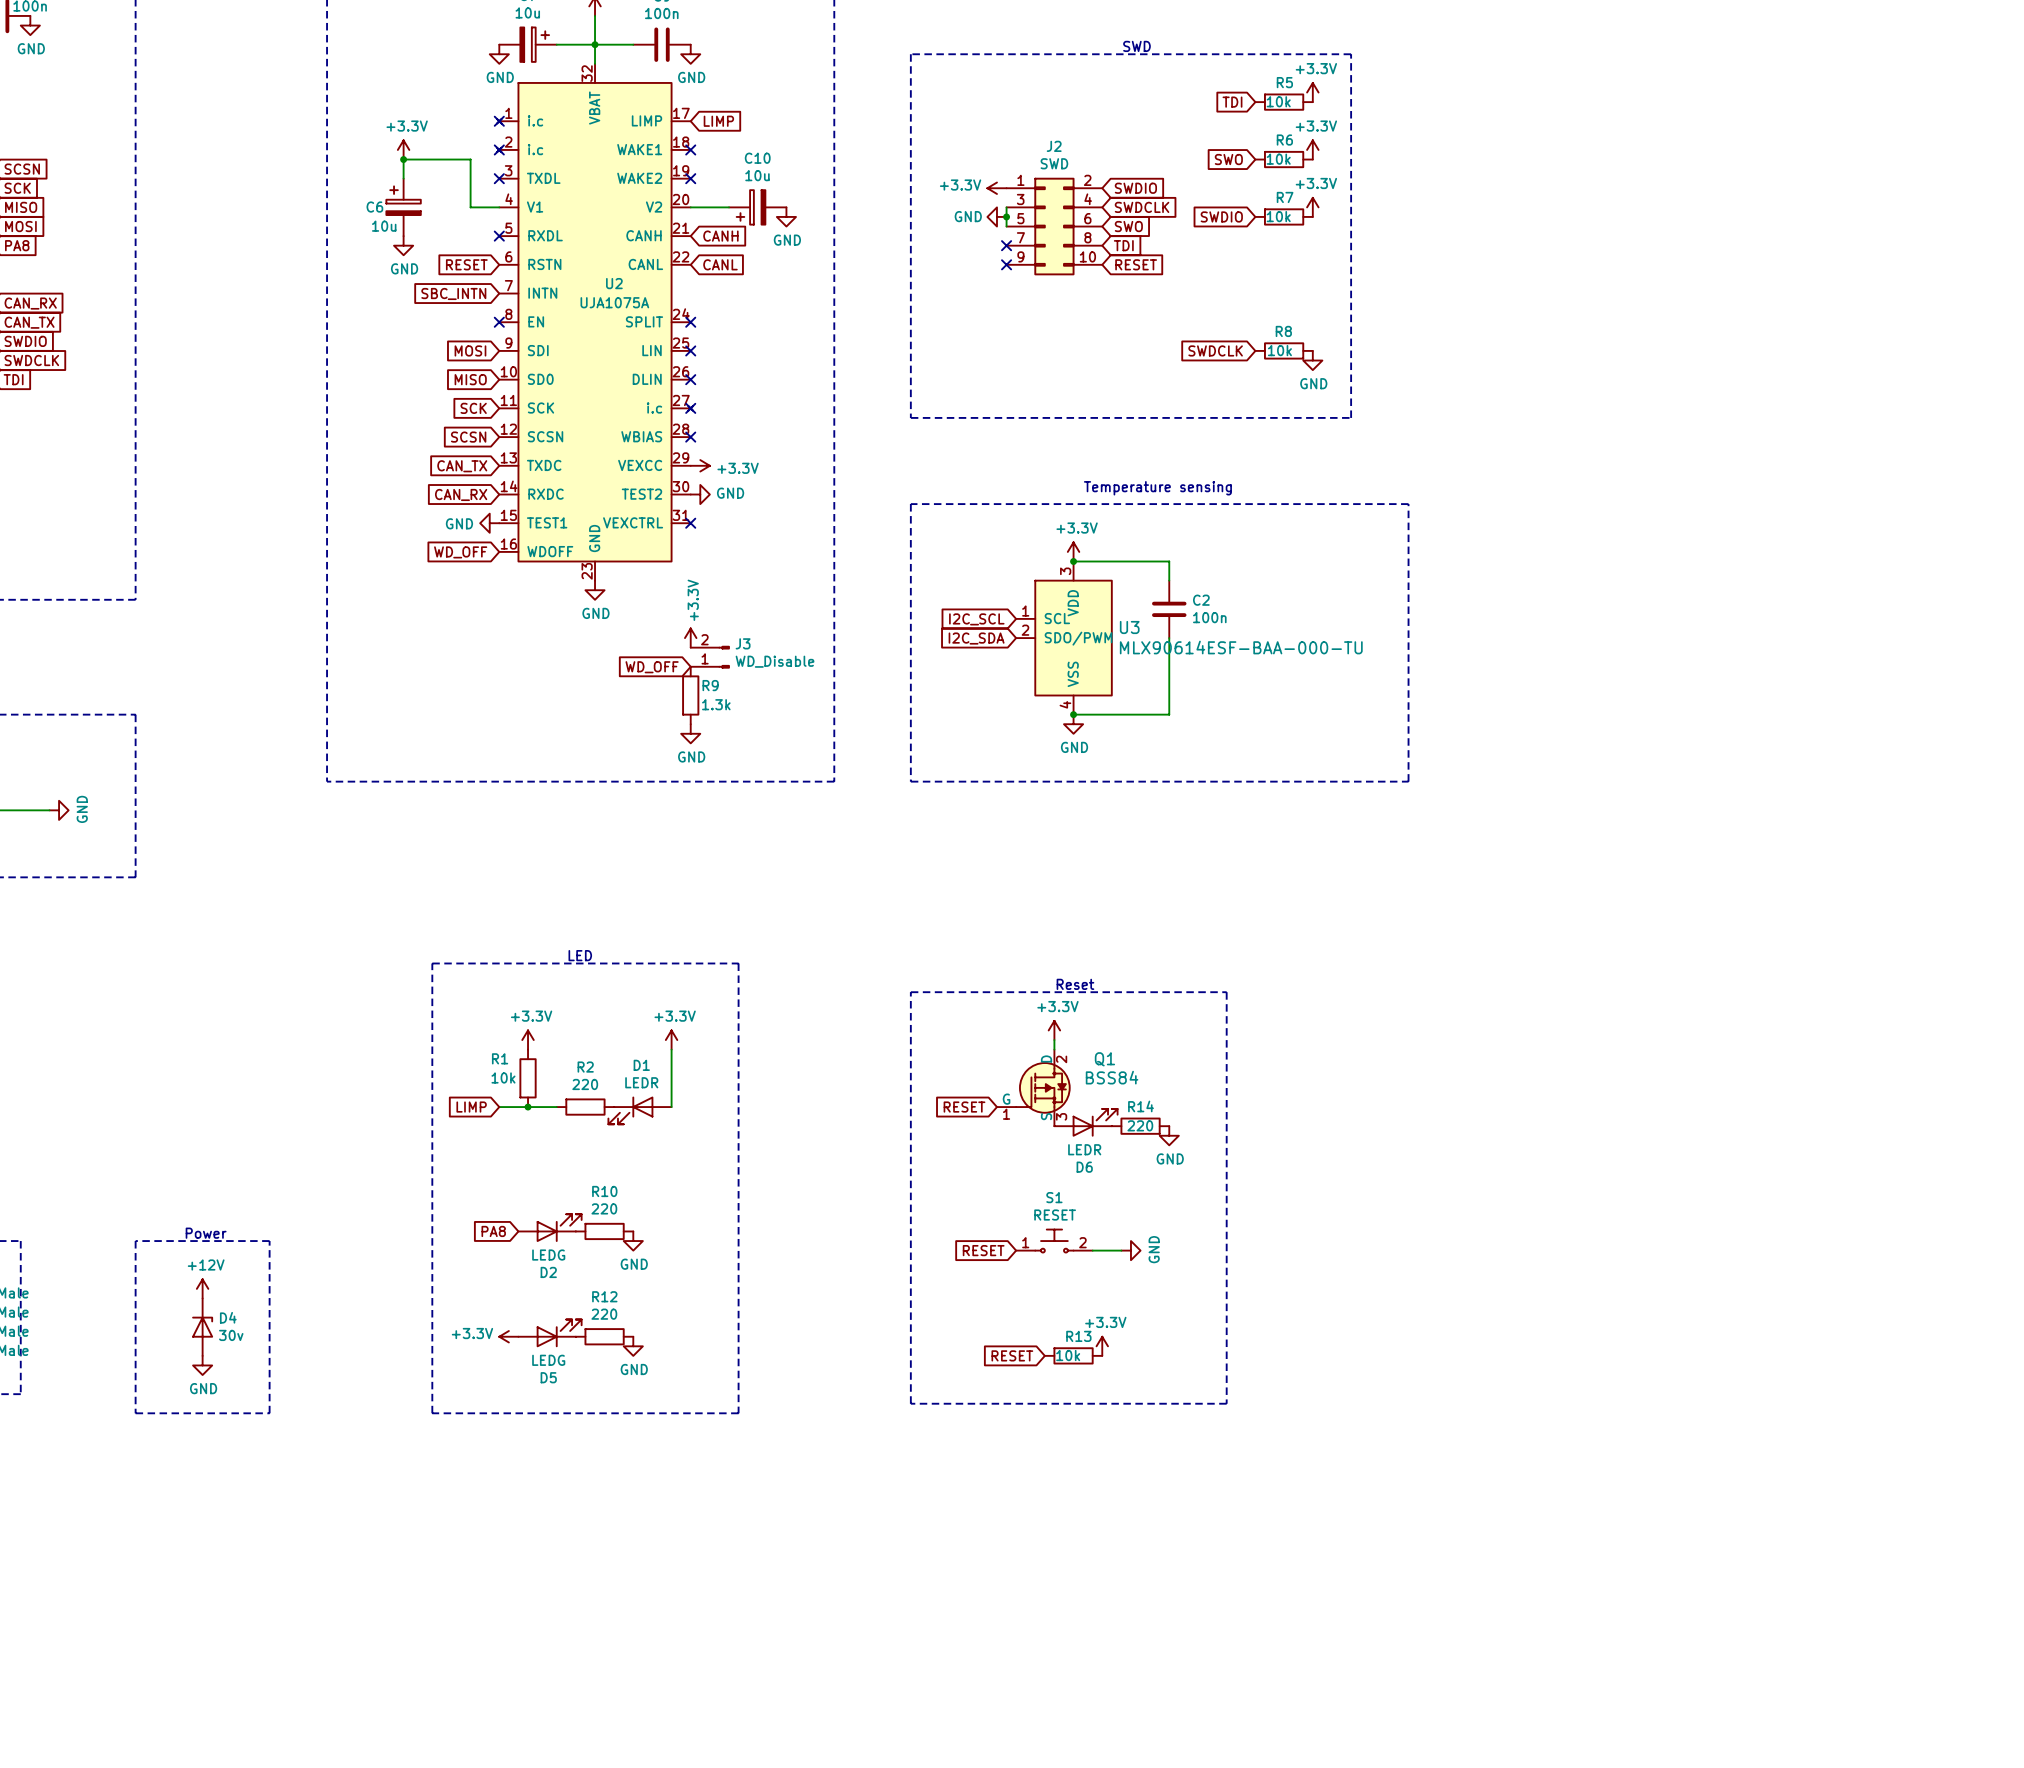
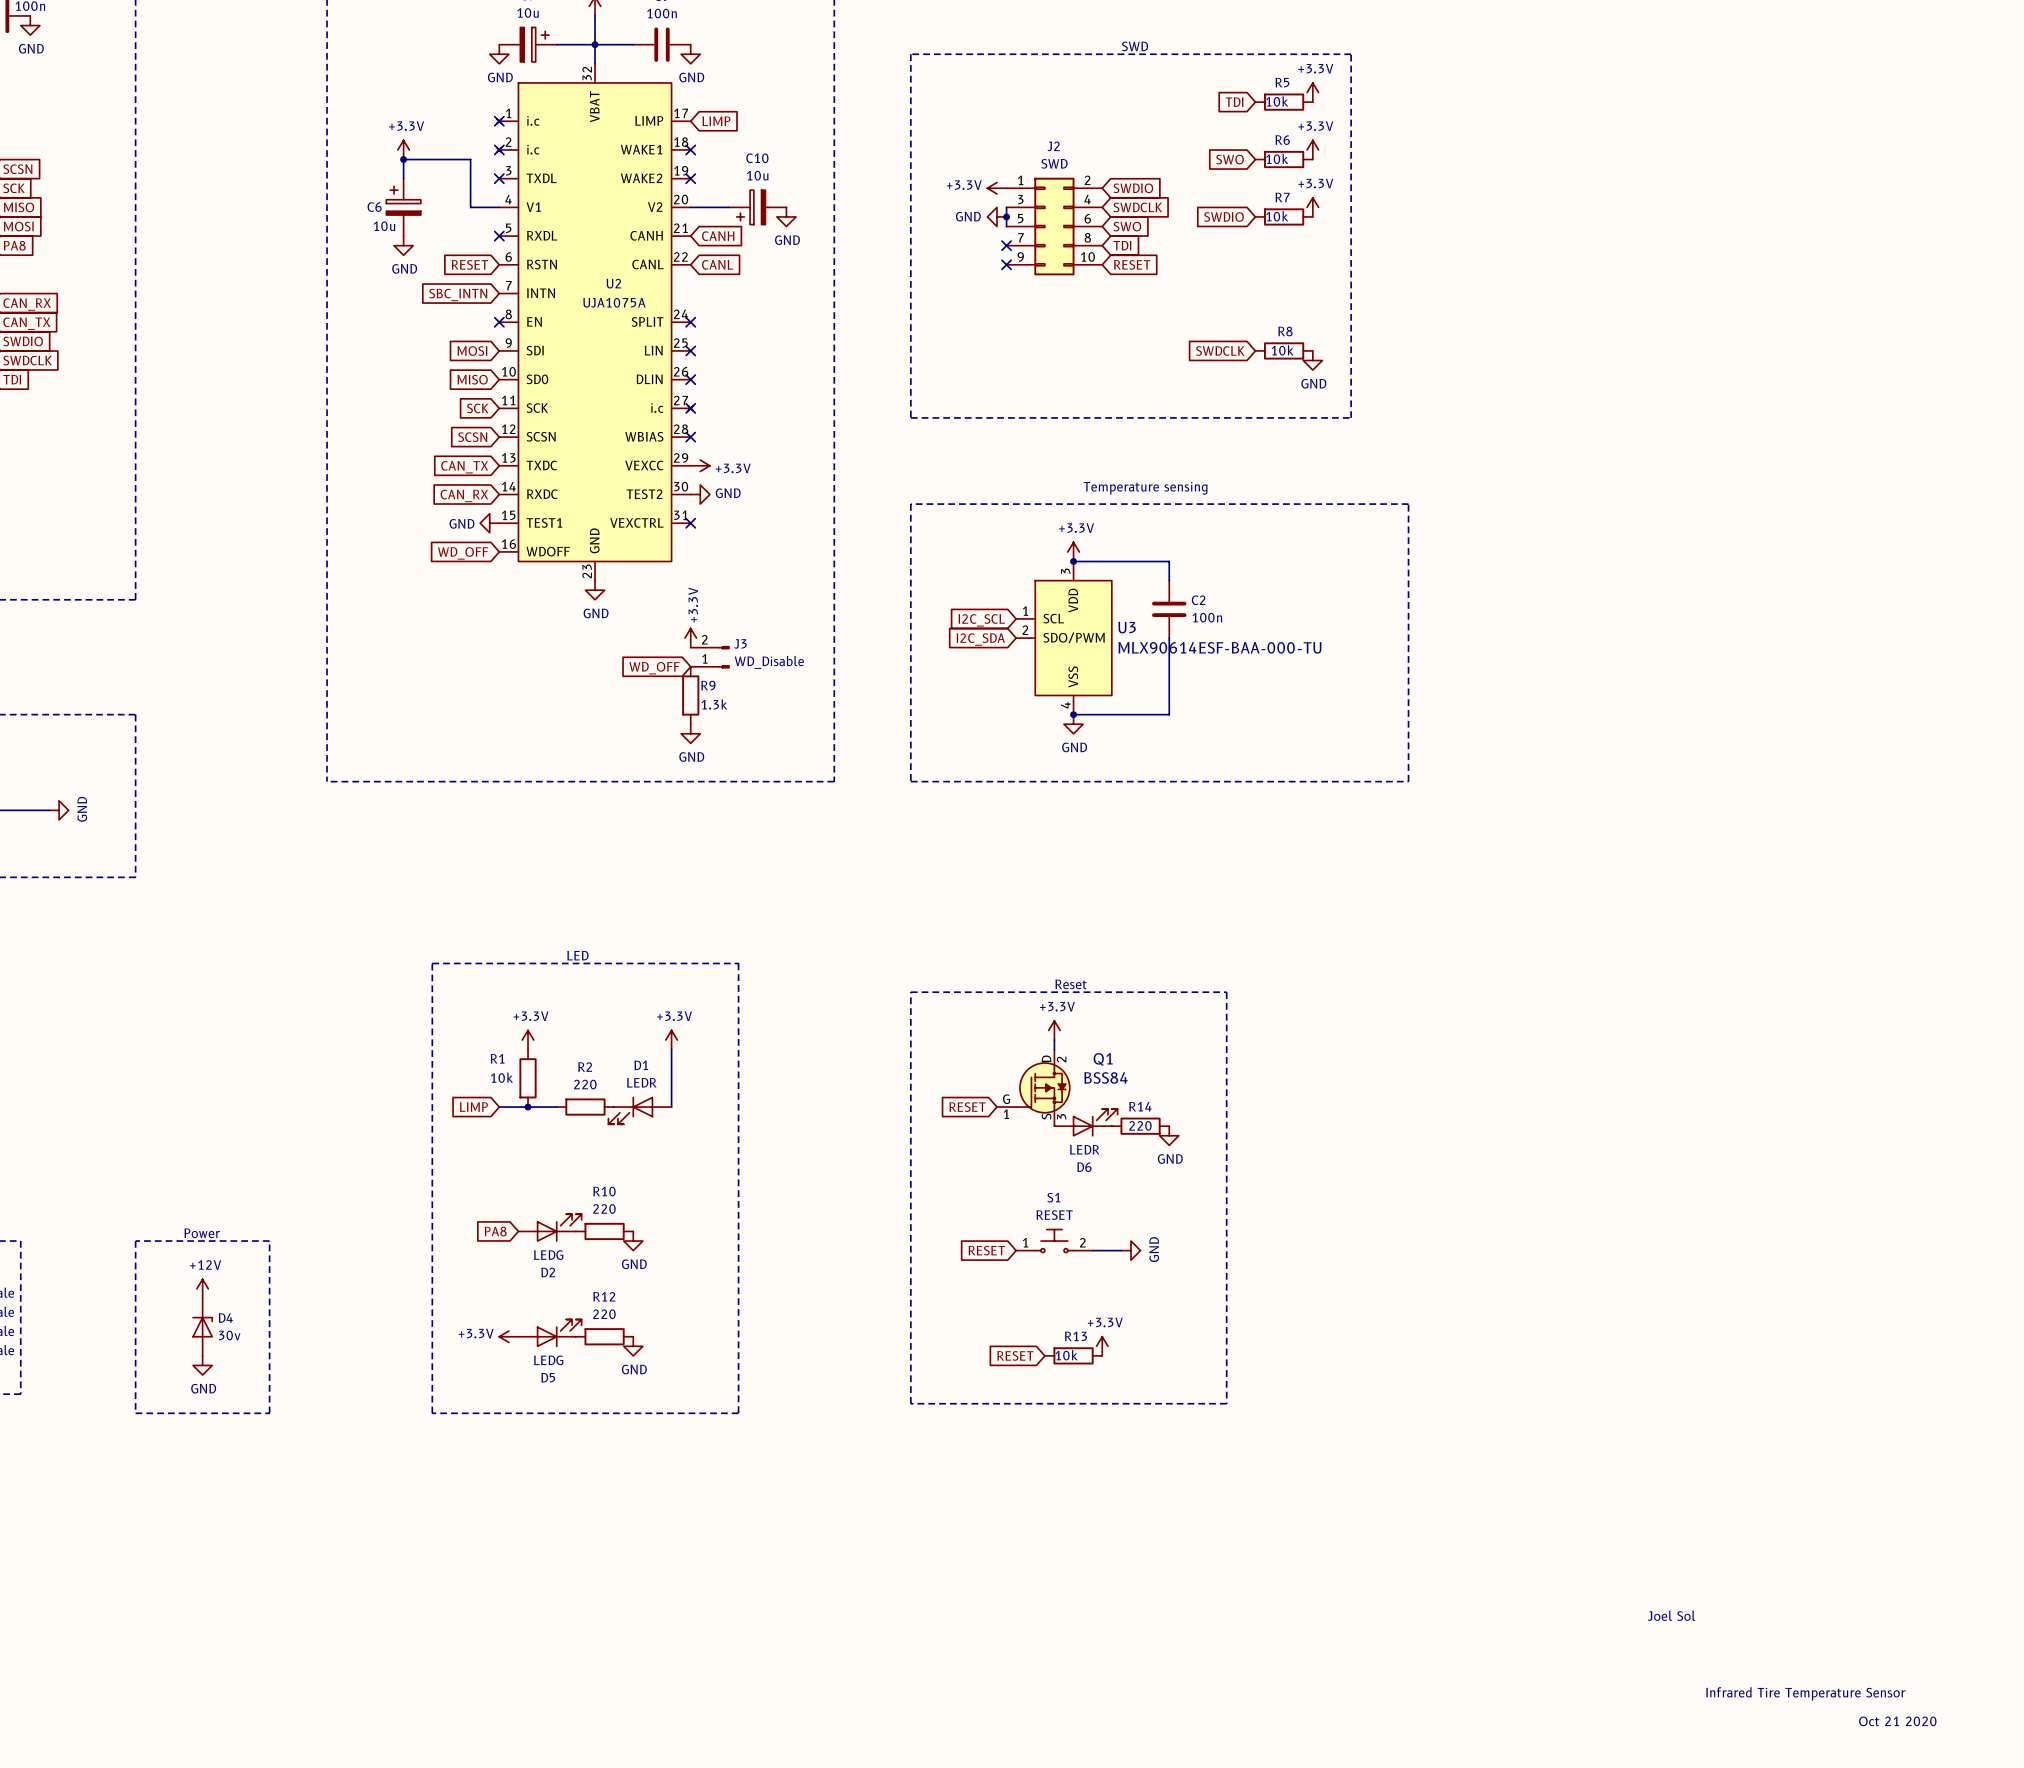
text: none -> Joel Sol (1671, 1615)
text: none -> Infrared Tire Temperature Sensor (1805, 1693)
text: none -> Oct 21 2020 (1897, 1721)

